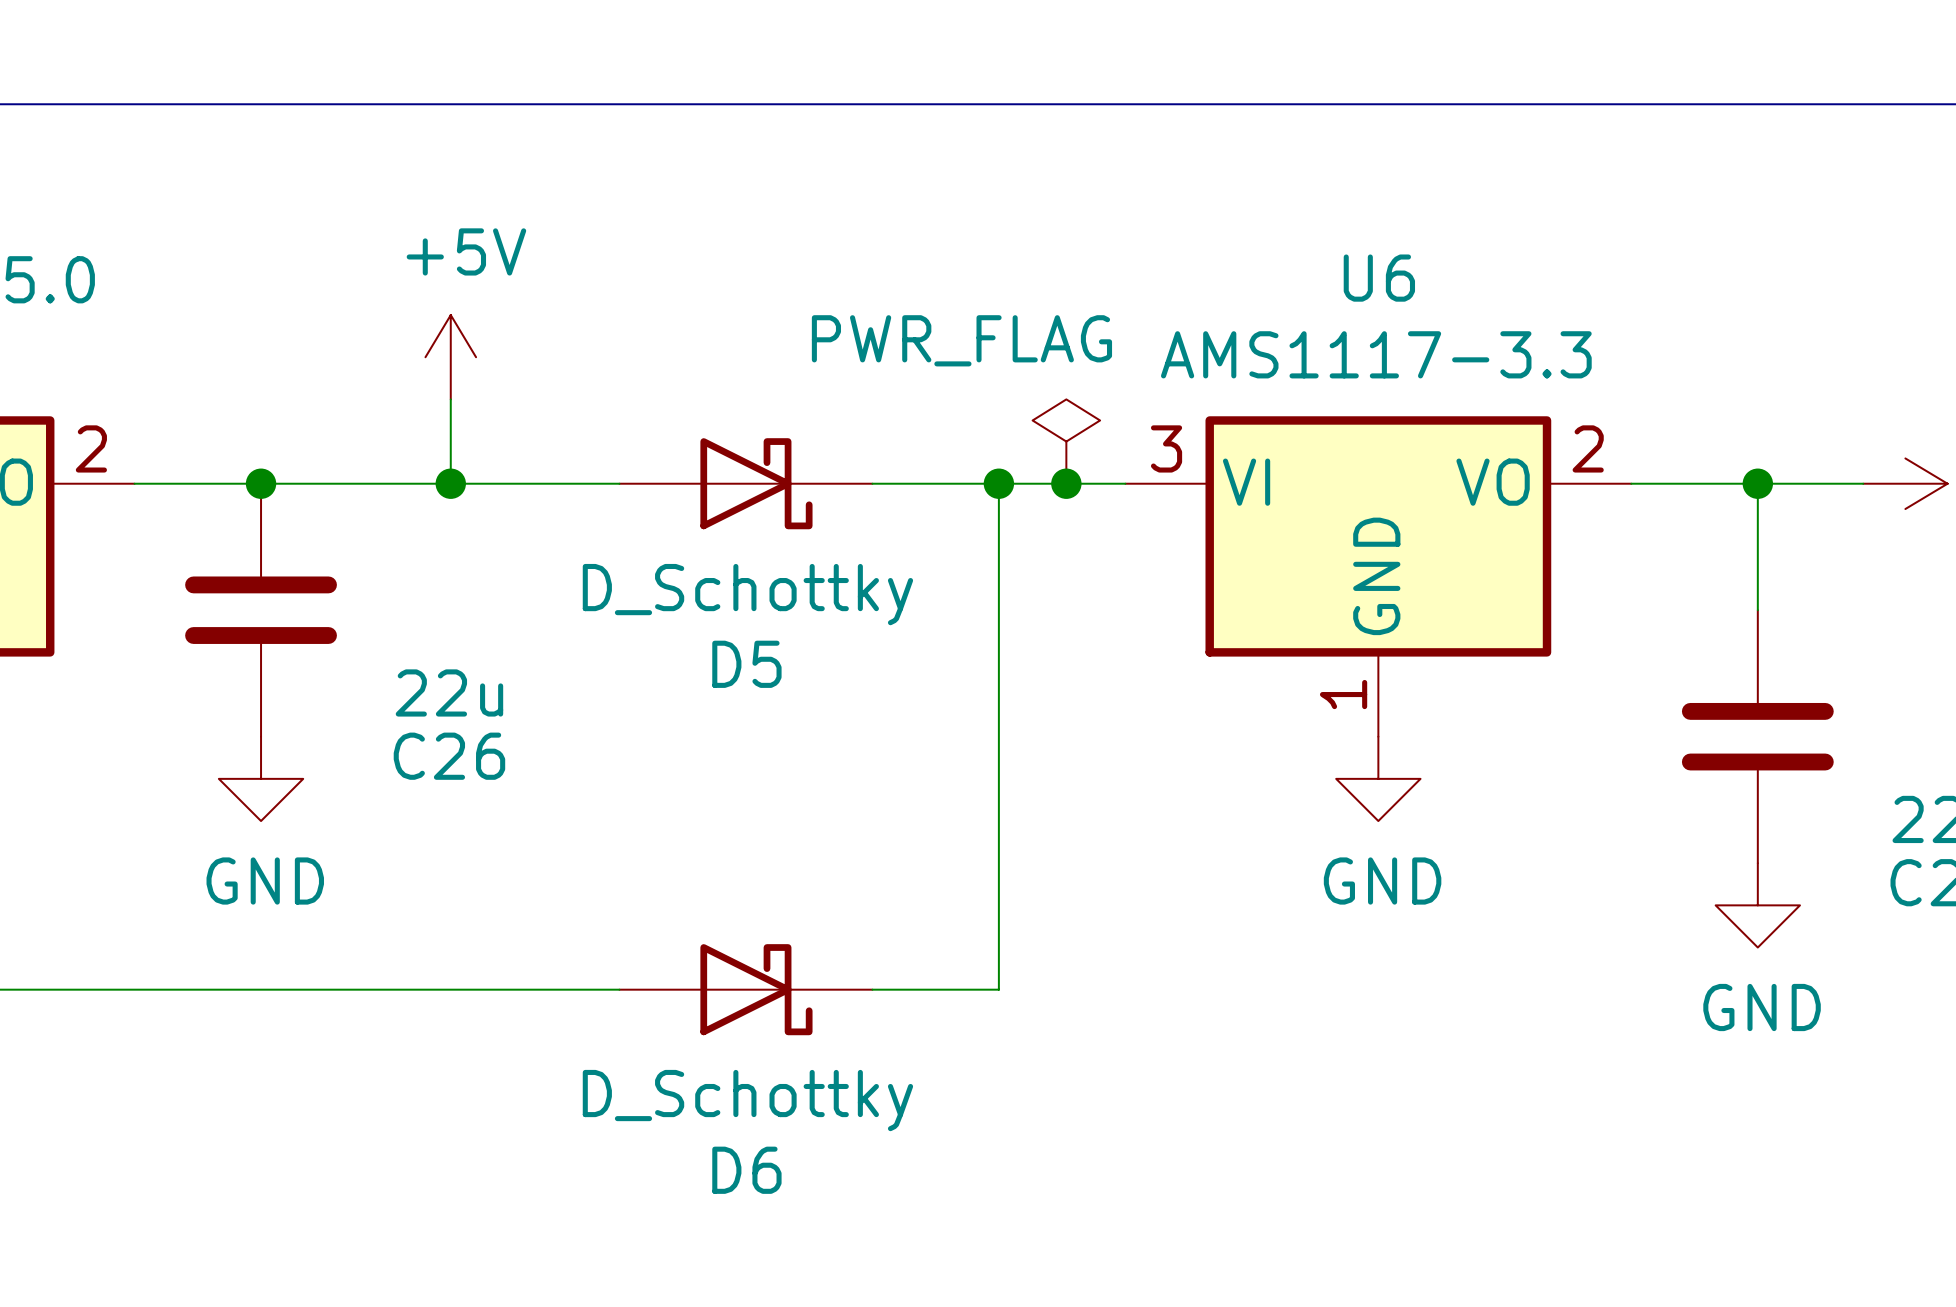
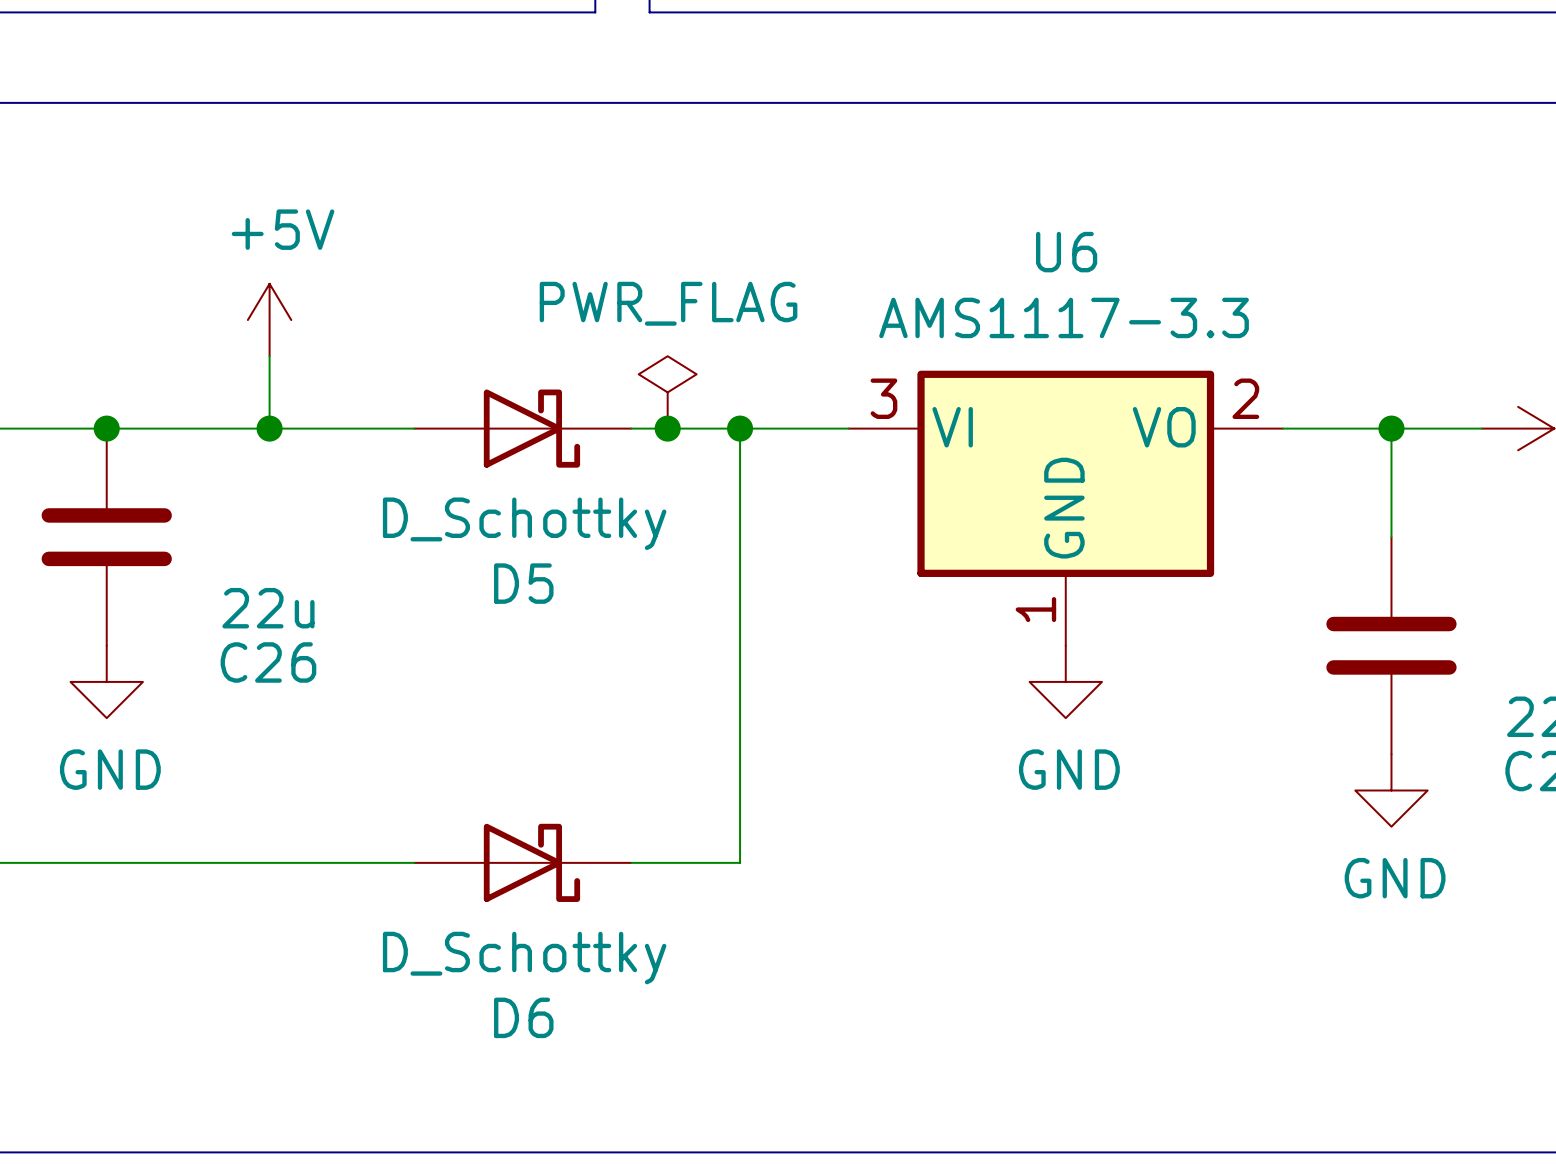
power symbol text position: PWR_FLAG (961, 340) -> PWR_FLAG (668, 303)
power symbol position: PWR_FLAG (1066, 441) -> PWR_FLAG (667, 392)
junction position: (1066, 483) -> (667, 428)

